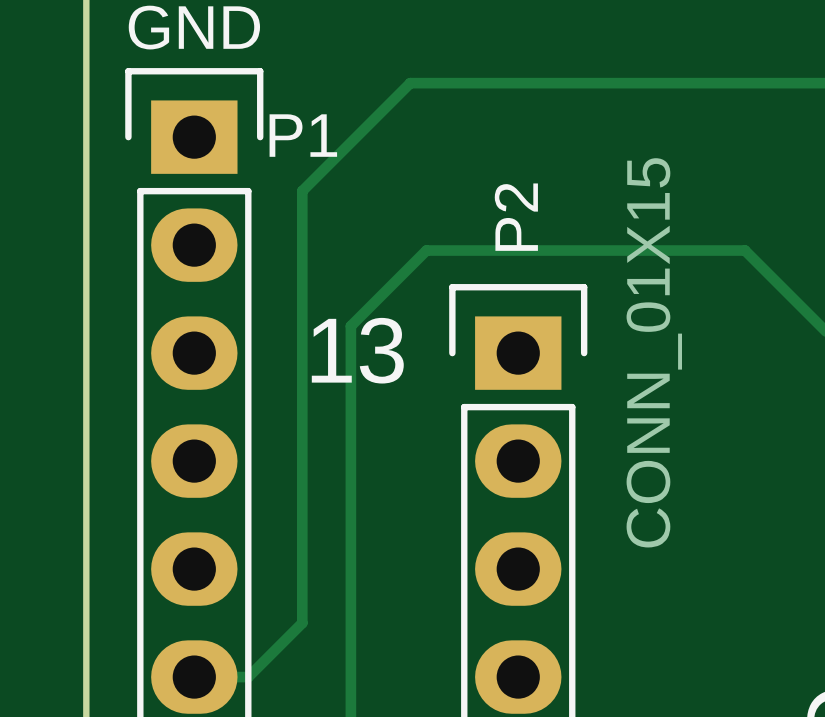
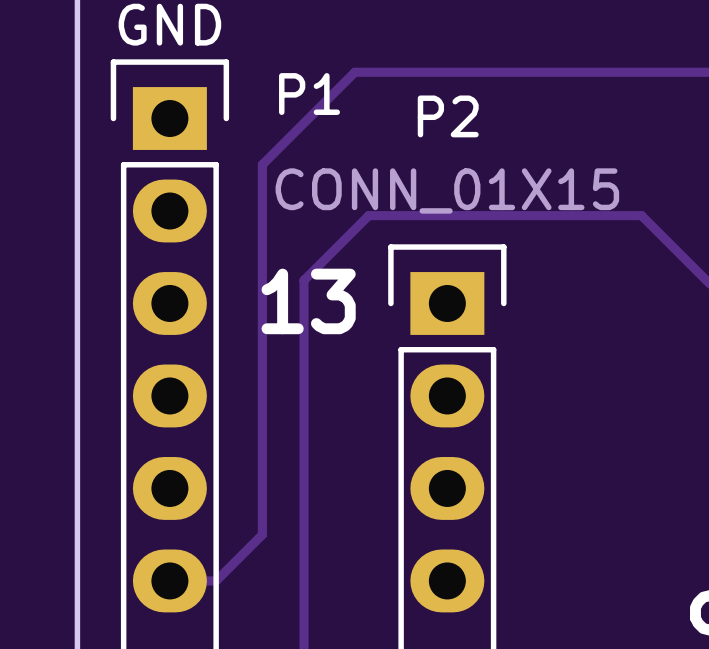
P1 name position: P1 (303, 135) -> P1 (309, 94)
P2 name rotation: 0° (516, 217) -> 90° clockwise (448, 116)
P2 value rotation: 0° (654, 352) -> 90° clockwise (447, 190)

